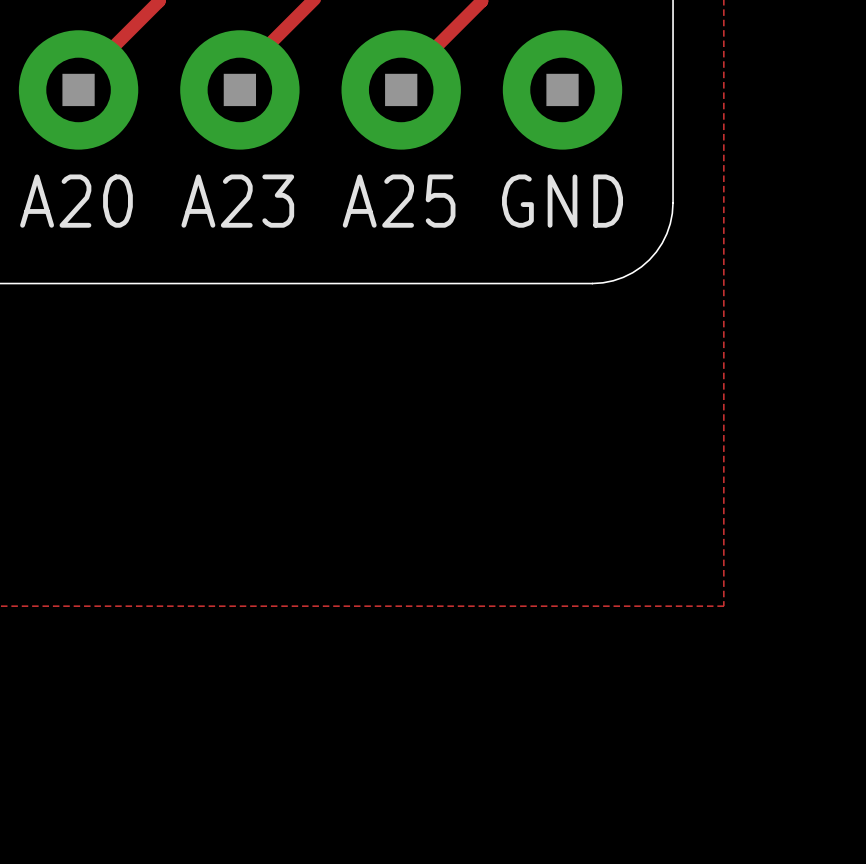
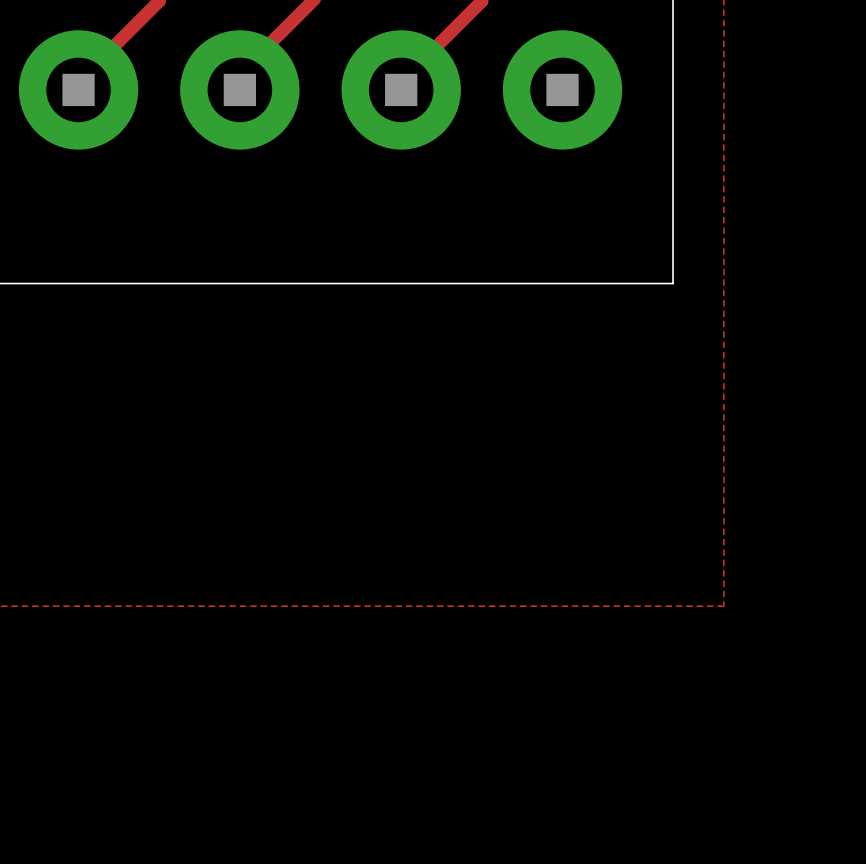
text: A20 (76, 201) -> none
text: A23 (237, 201) -> none
text: A25 (399, 201) -> none
text: GND (562, 201) -> none
board edge: (673, 202) (666, 233) (649, 259) (623, 277) (592, 283) -> (673, 202) (673, 283) (592, 283)

